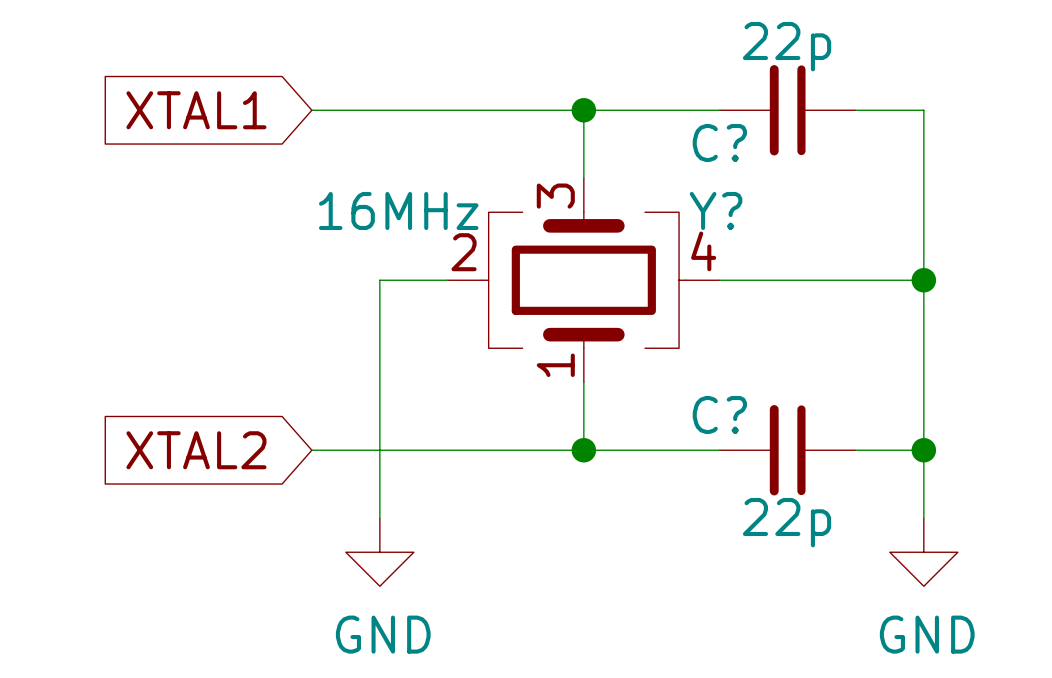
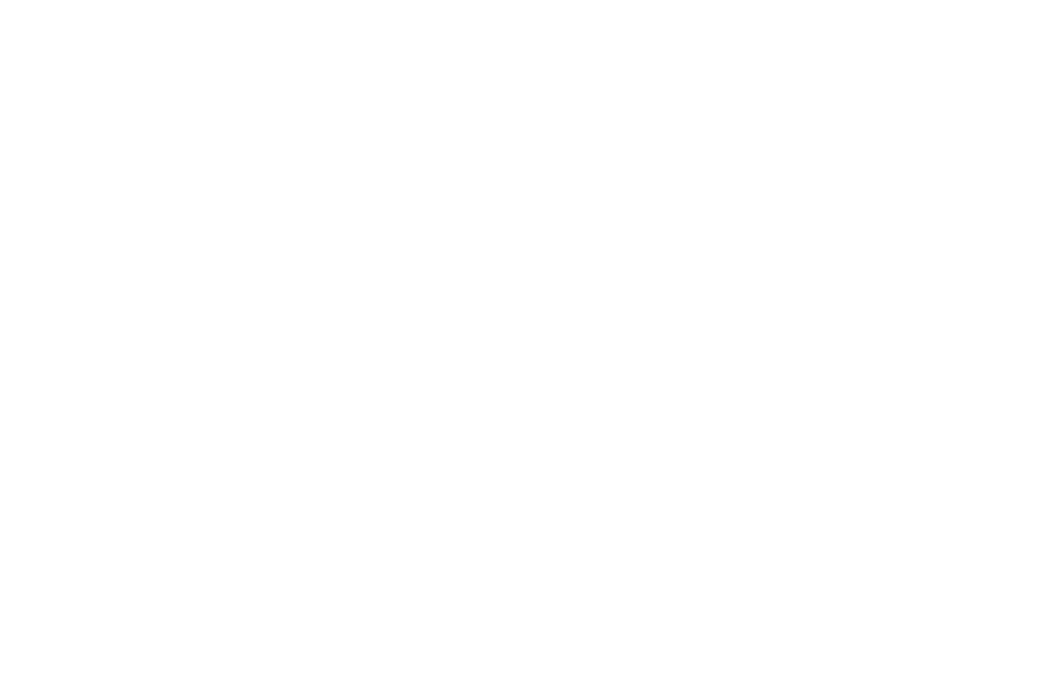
global label: XTAL1 (196, 110) -> none
wire: (311, 110) (719, 110) -> none
wire: (583, 110) (583, 178) -> none
junction: (583, 110) -> none
C?: 22p (787, 110) -> none
wire: (855, 110) (923, 110) (923, 518) -> none
wire: (447, 280) (379, 280) (379, 518) -> none
Y?: 16MHz (583, 280) -> none
wire: (719, 280) (923, 280) -> none
junction: (923, 280) -> none
wire: (583, 382) (583, 450) -> none
global label: XTAL2 (196, 450) -> none
wire: (311, 450) (719, 450) -> none
junction: (583, 450) -> none
C?: 22p (787, 450) -> none
wire: (855, 450) (923, 450) -> none
junction: (923, 450) -> none
power symbol: GND (379, 552) -> none
power symbol: GND (923, 552) -> none

